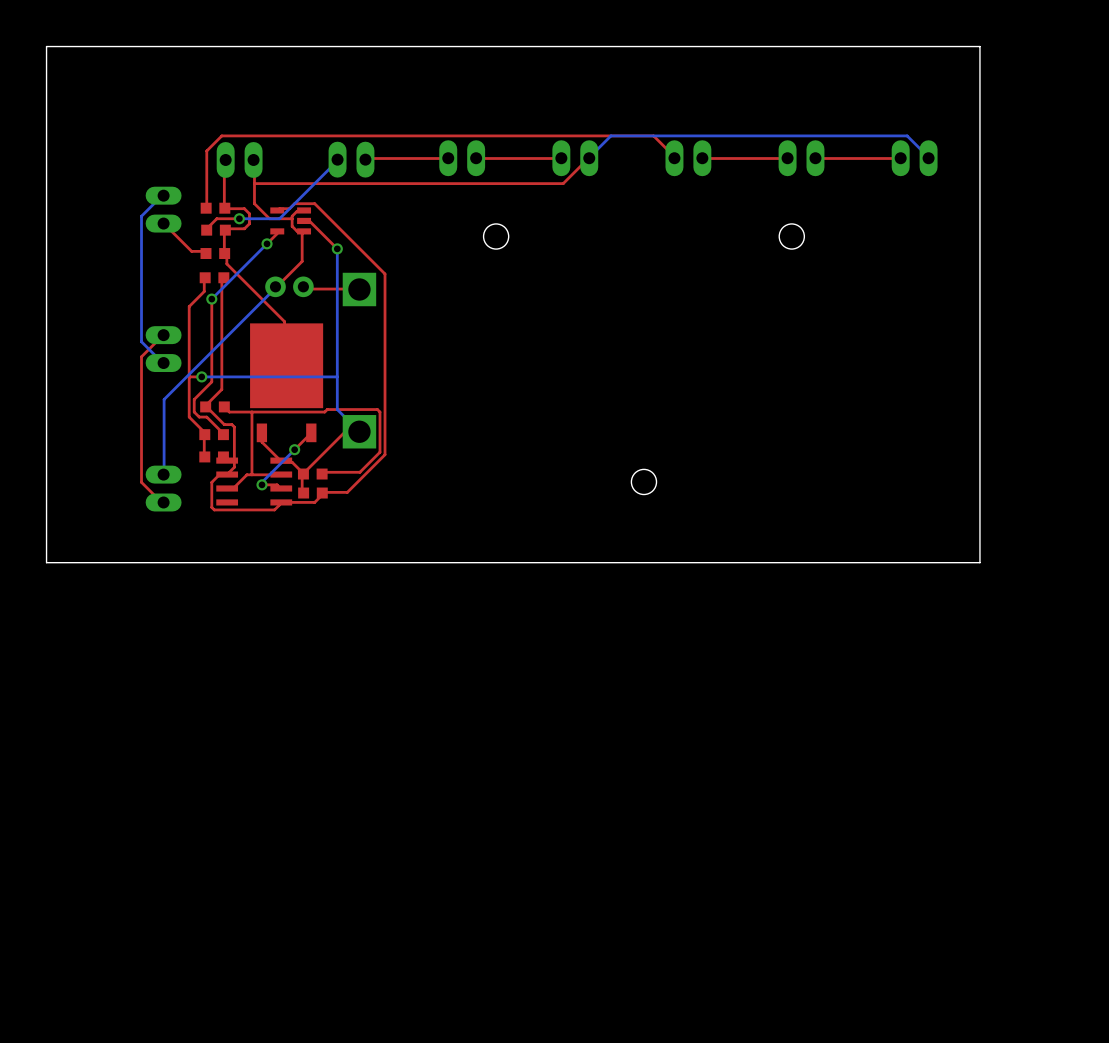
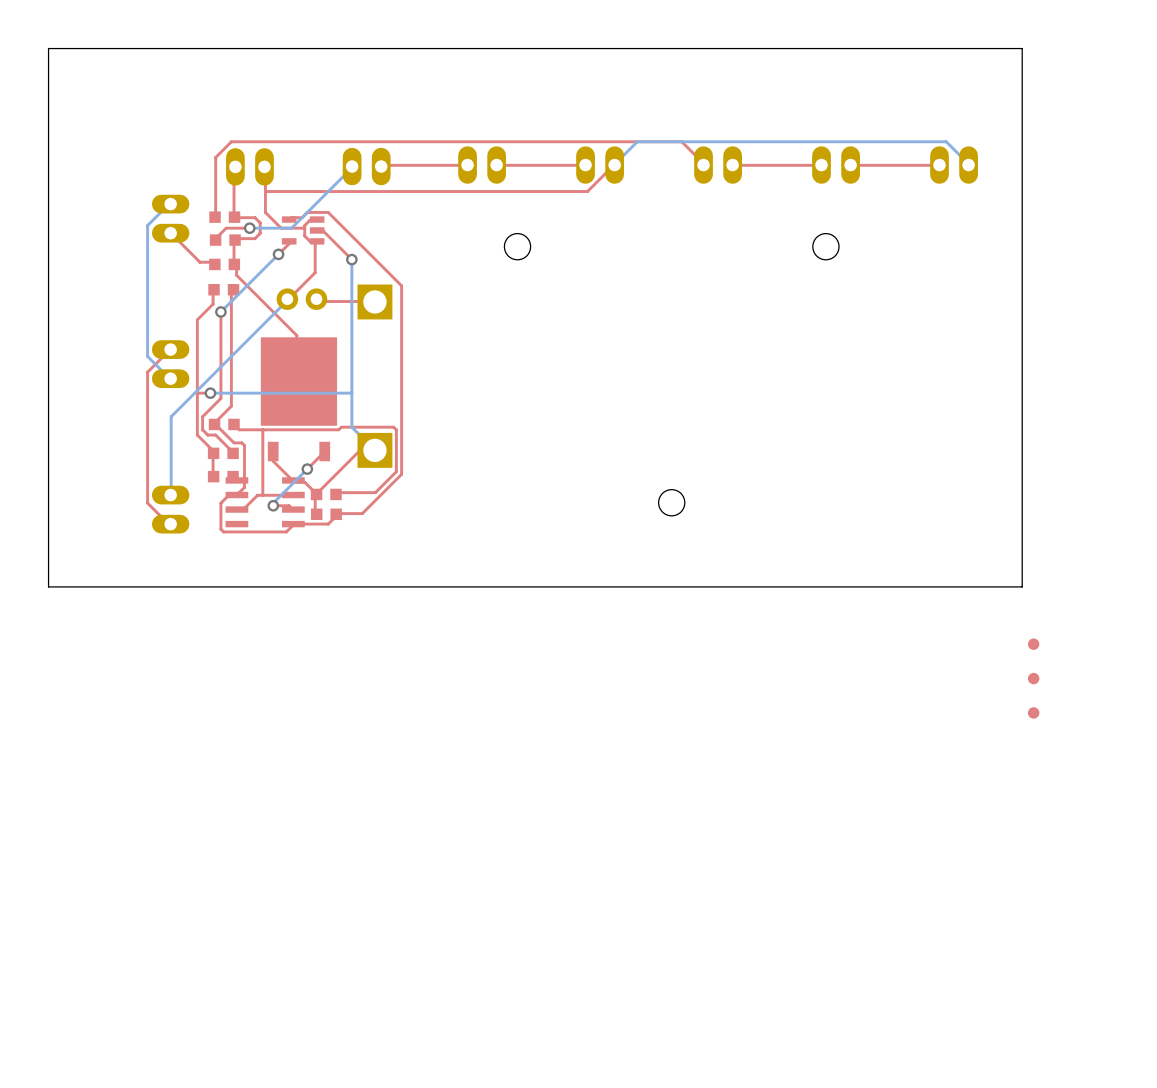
part: none -> (1033, 644)
part: none -> (1033, 678)
part: none -> (1033, 712)

